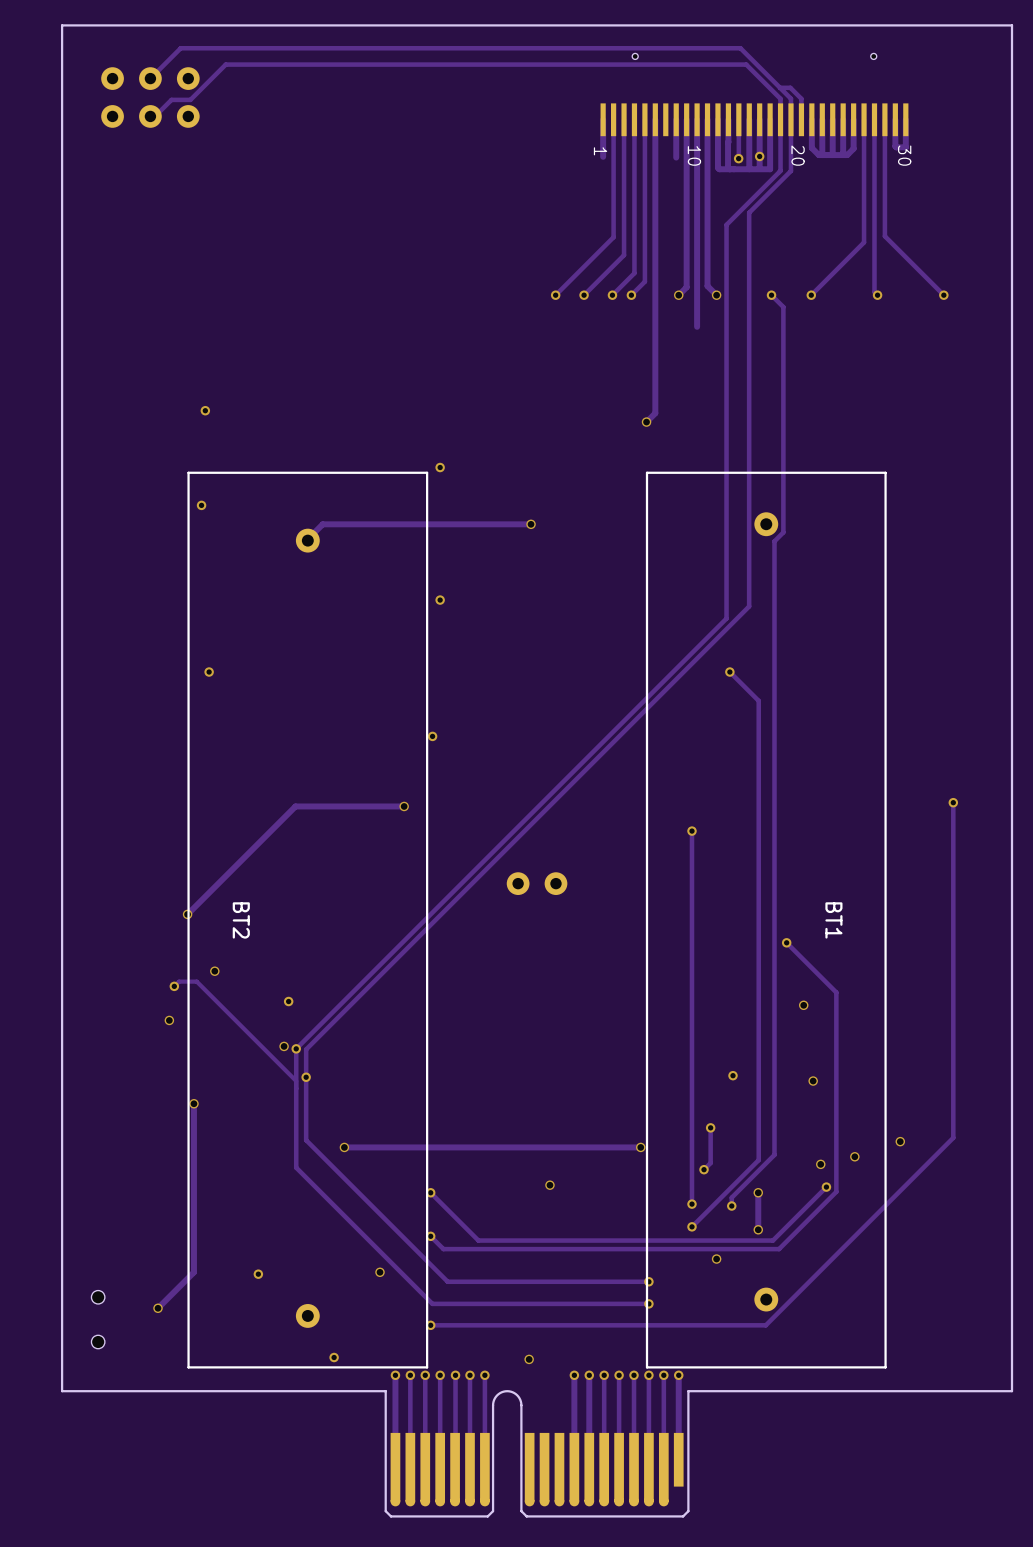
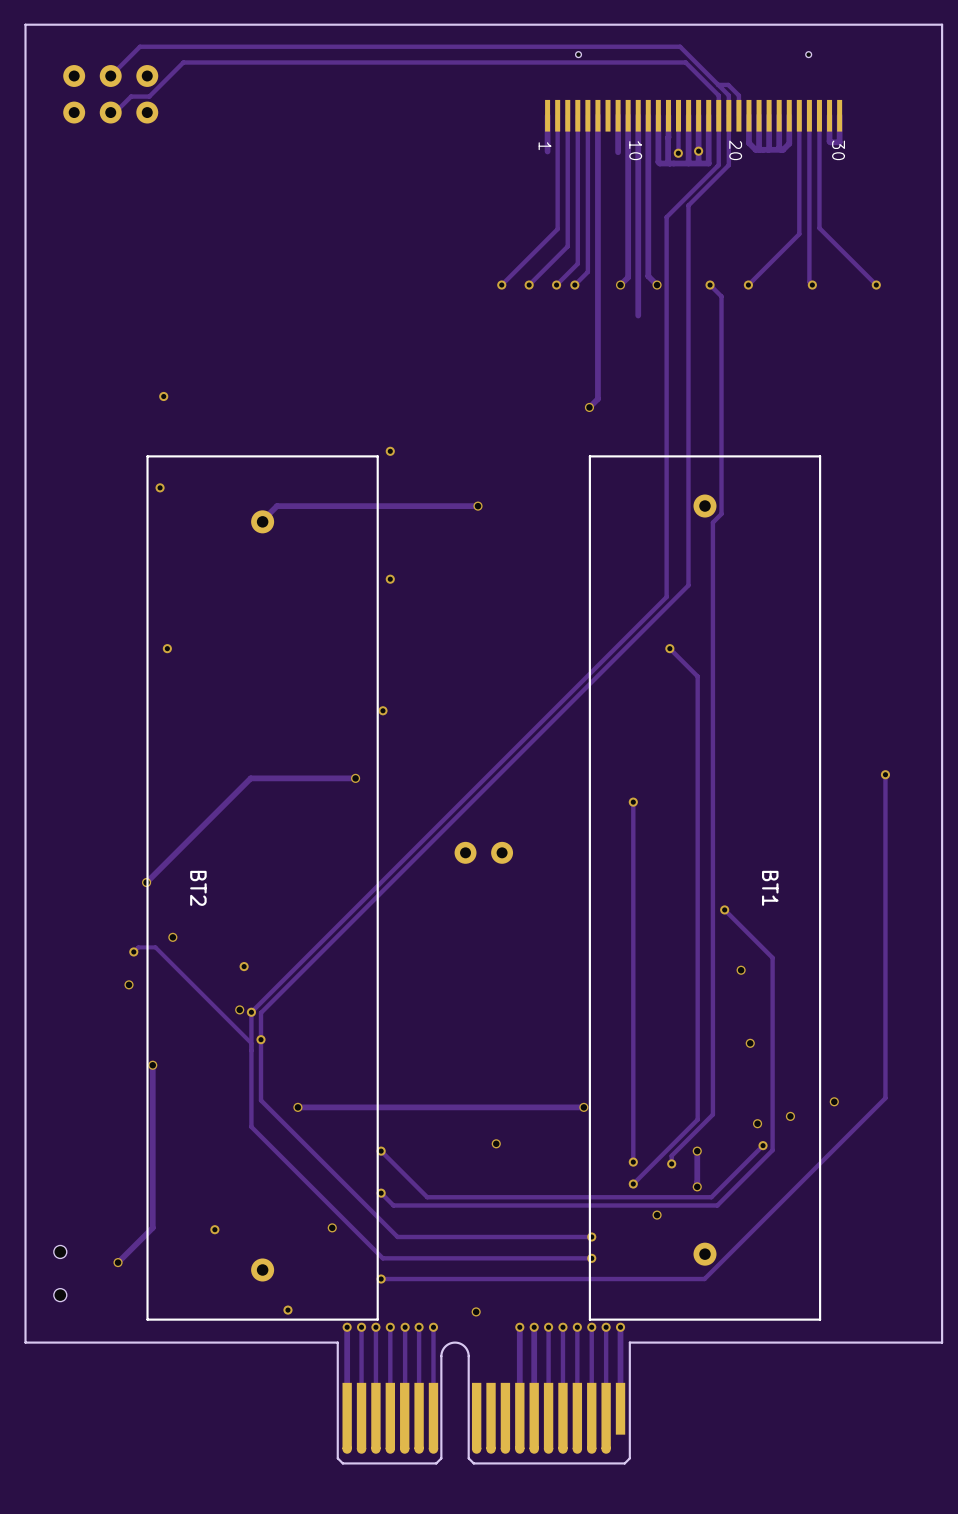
via: (733, 1075) -> none
track: (710, 1127) (710, 1163) (704, 1169) -> none
via: (710, 1127) -> none
via: (704, 1169) -> none

